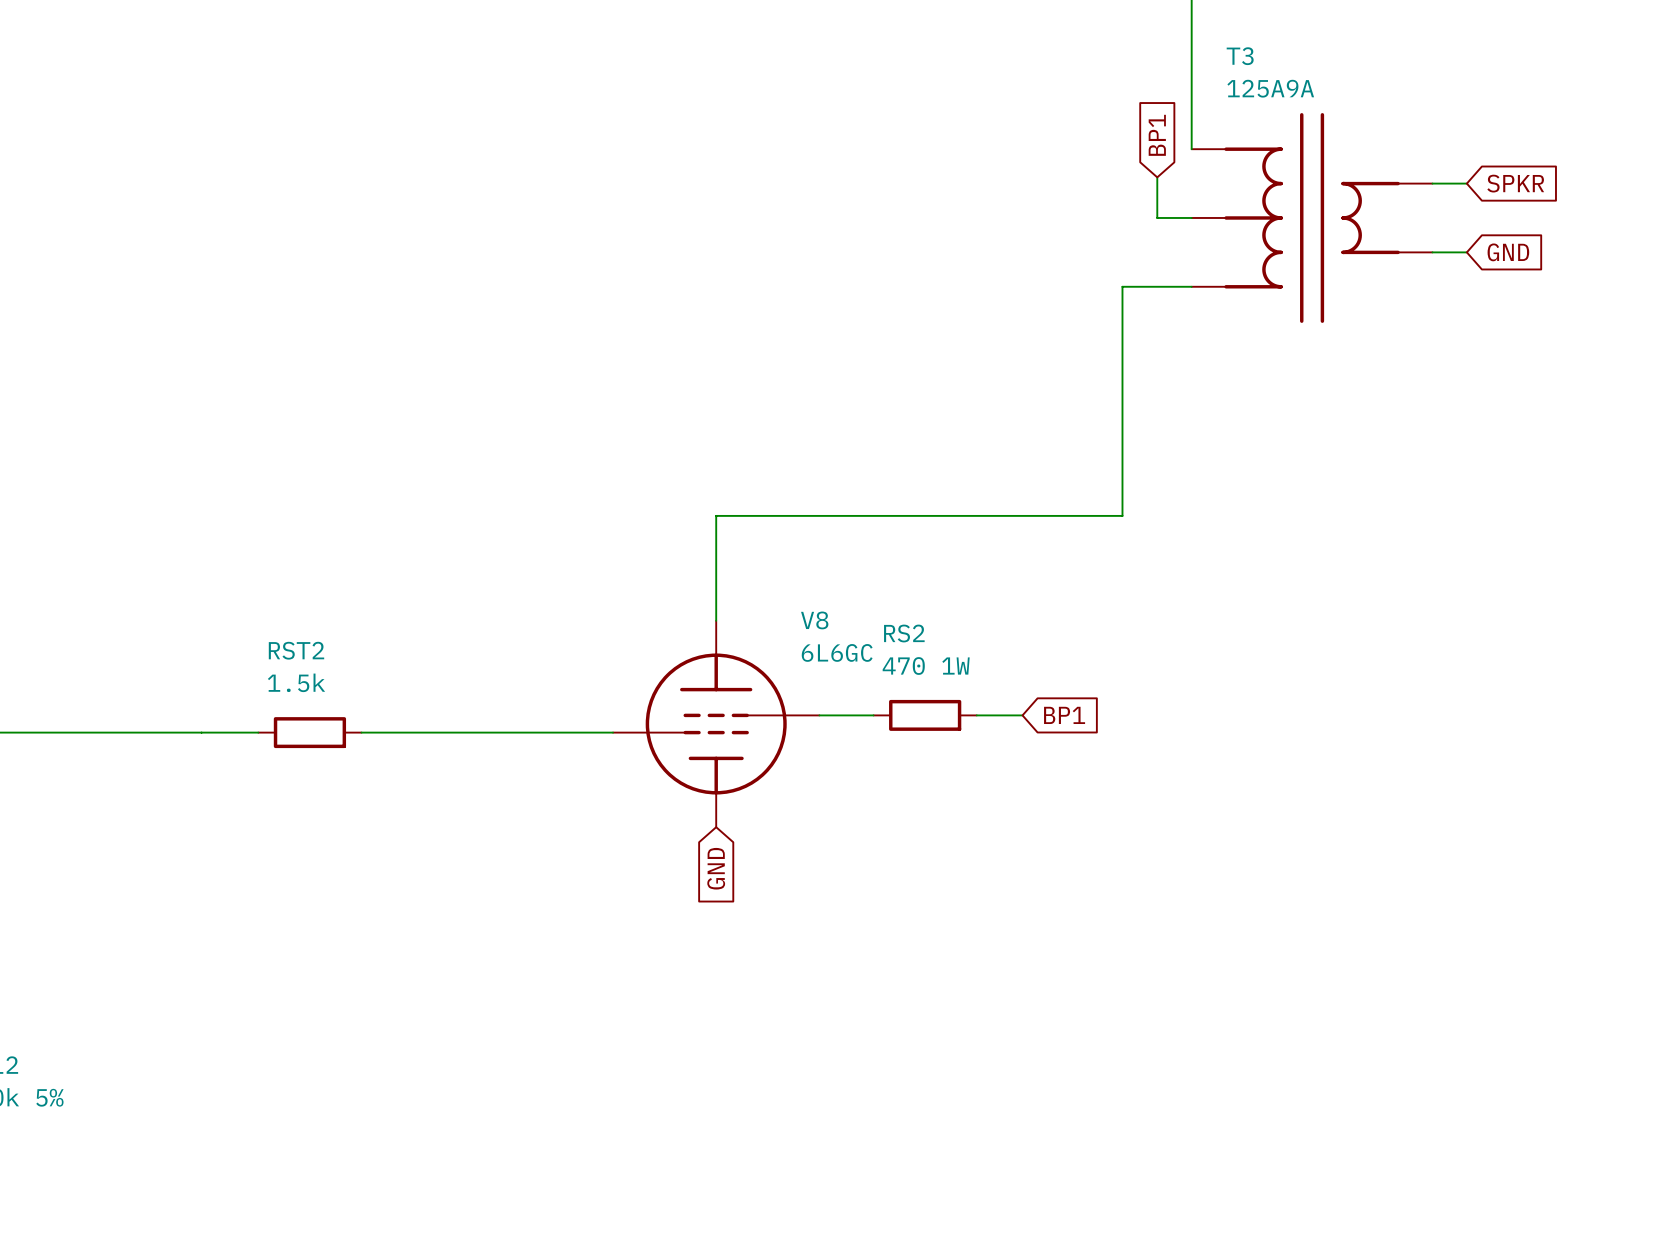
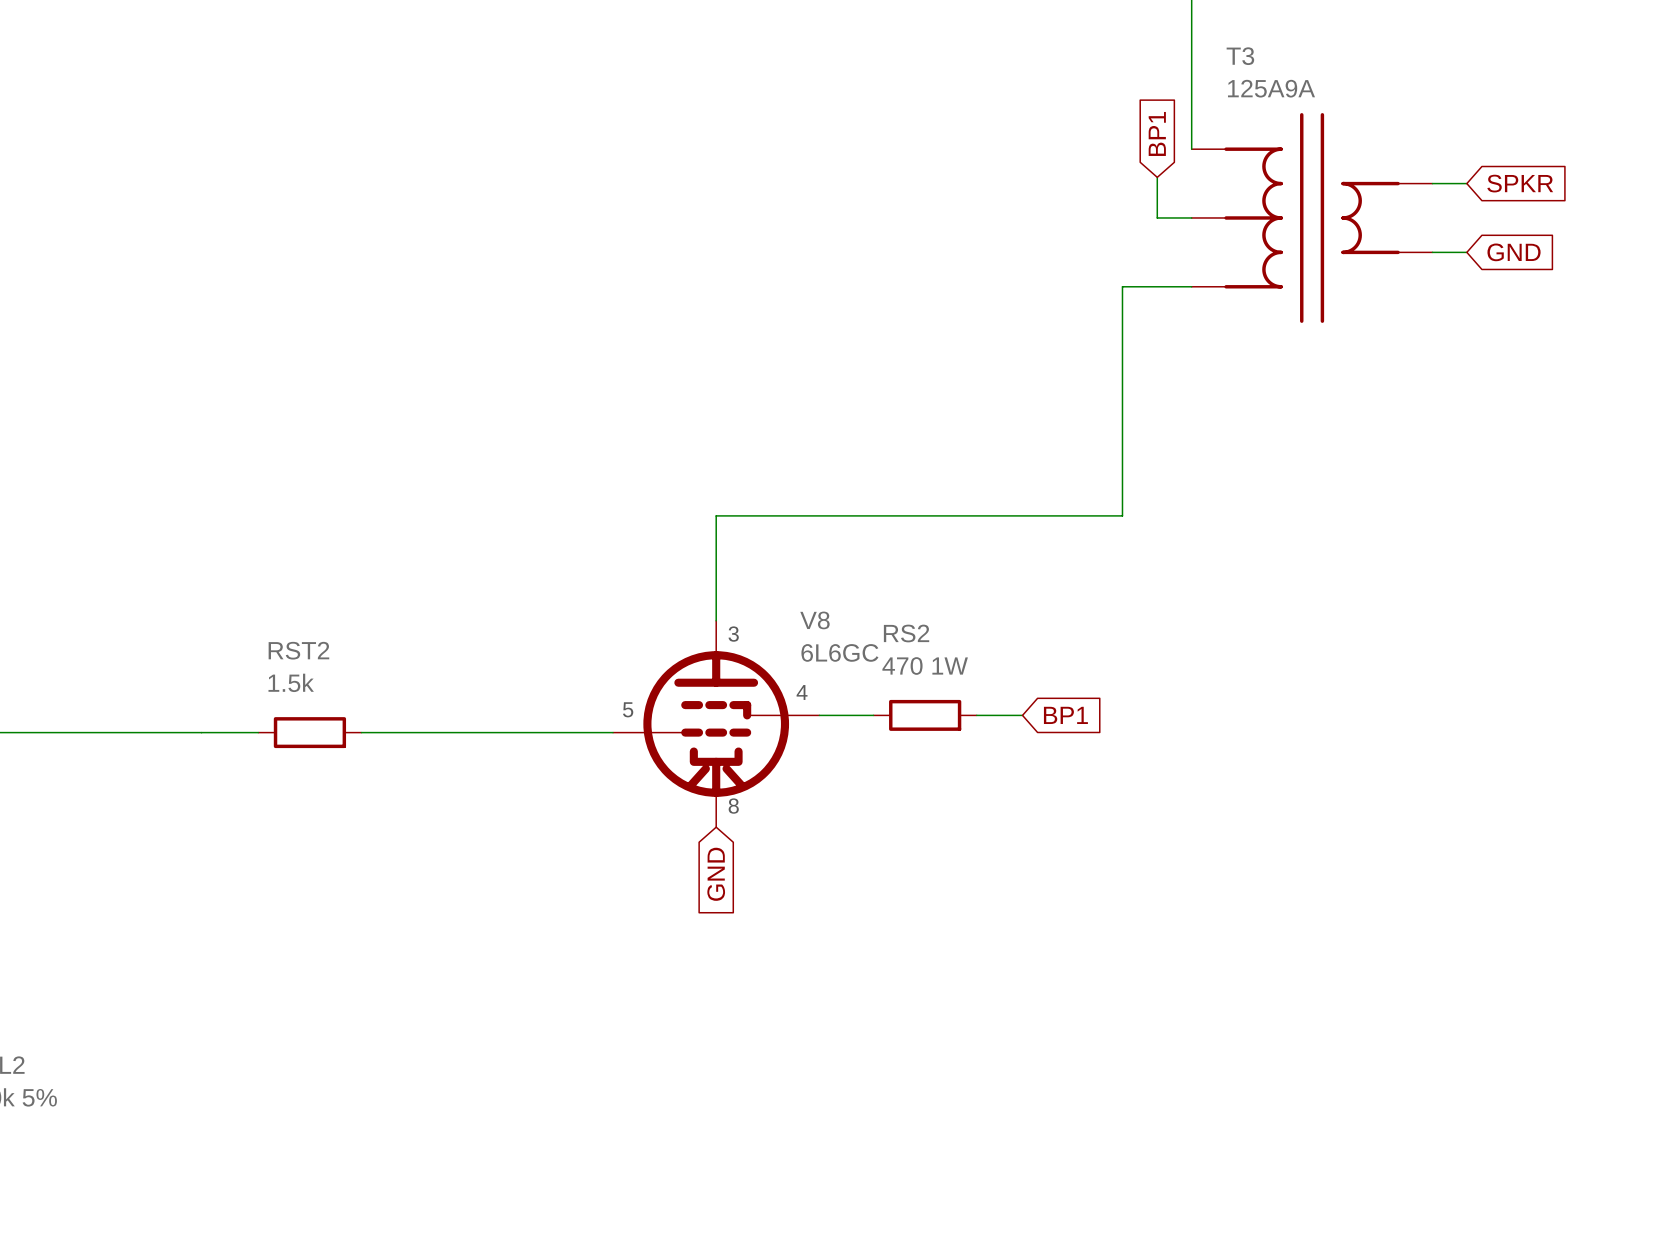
V8 symbol: [613, 620, 820, 828] -> [613, 620, 820, 828]
text: none -> 3 (733, 634)
text: none -> 4 (802, 692)
text: none -> 5 (628, 709)
text: none -> 8 (733, 806)

